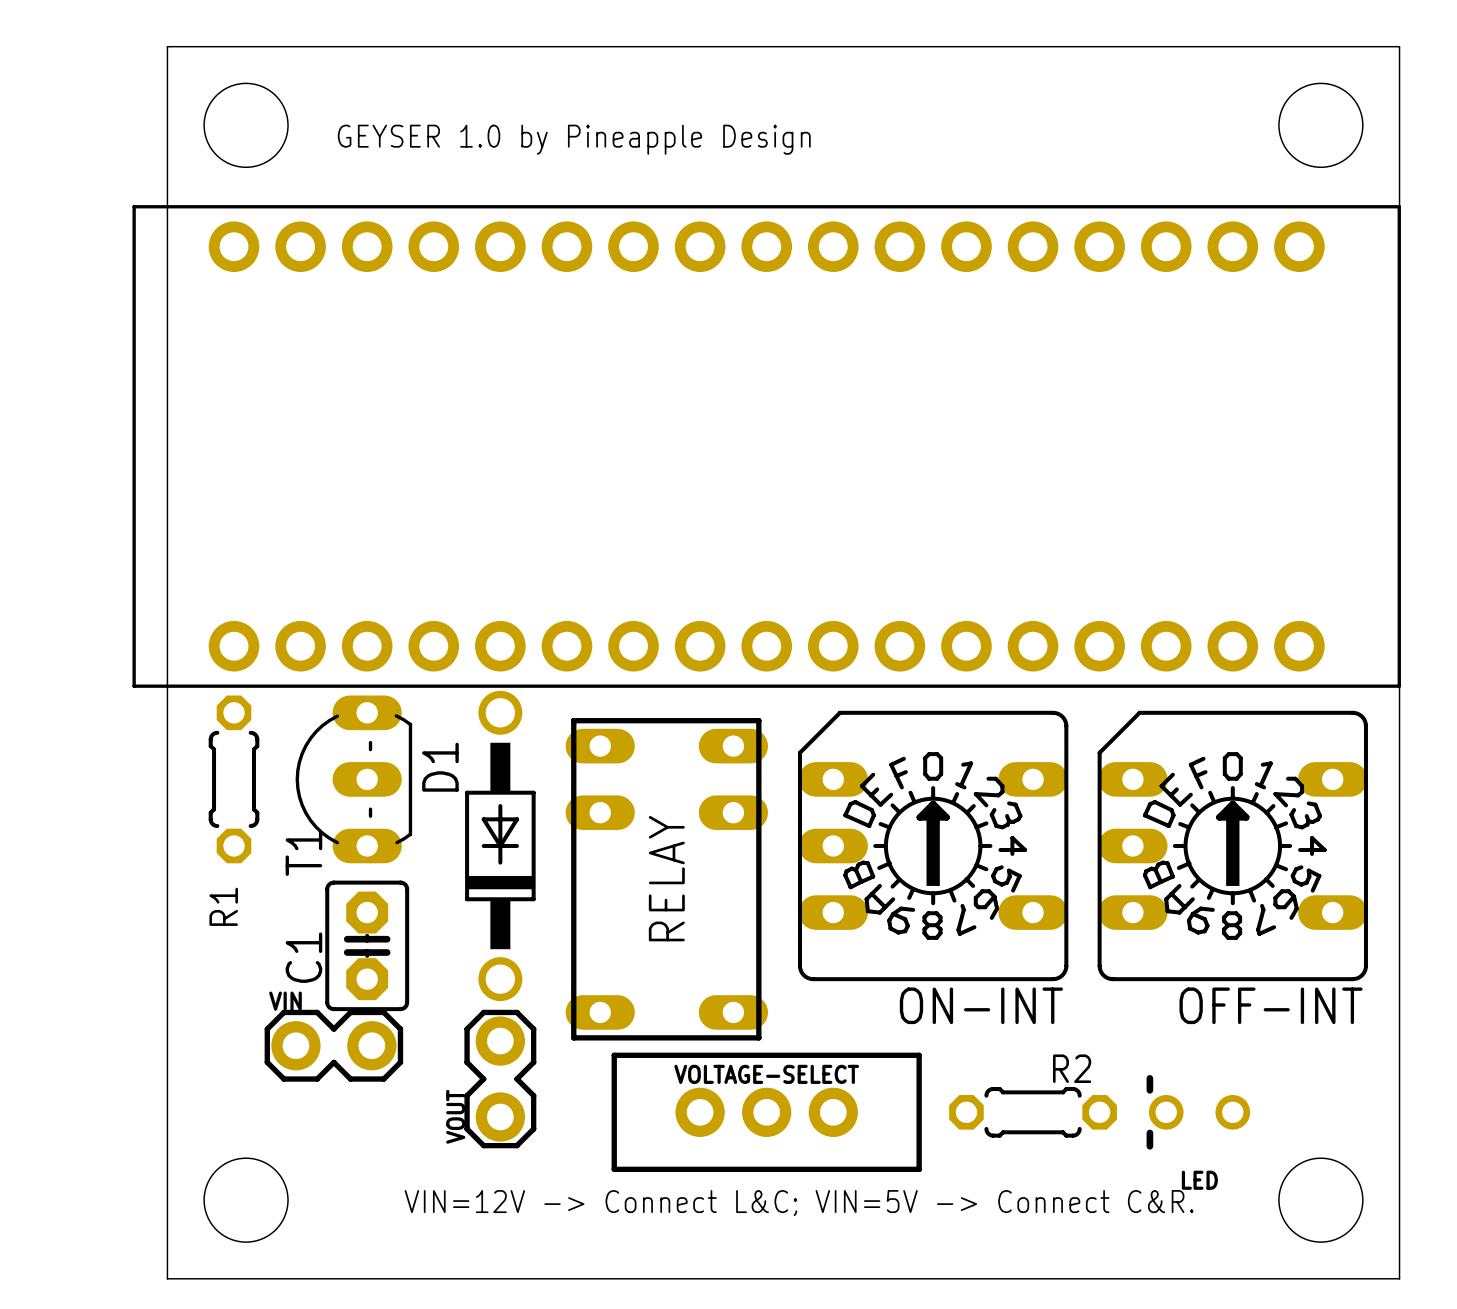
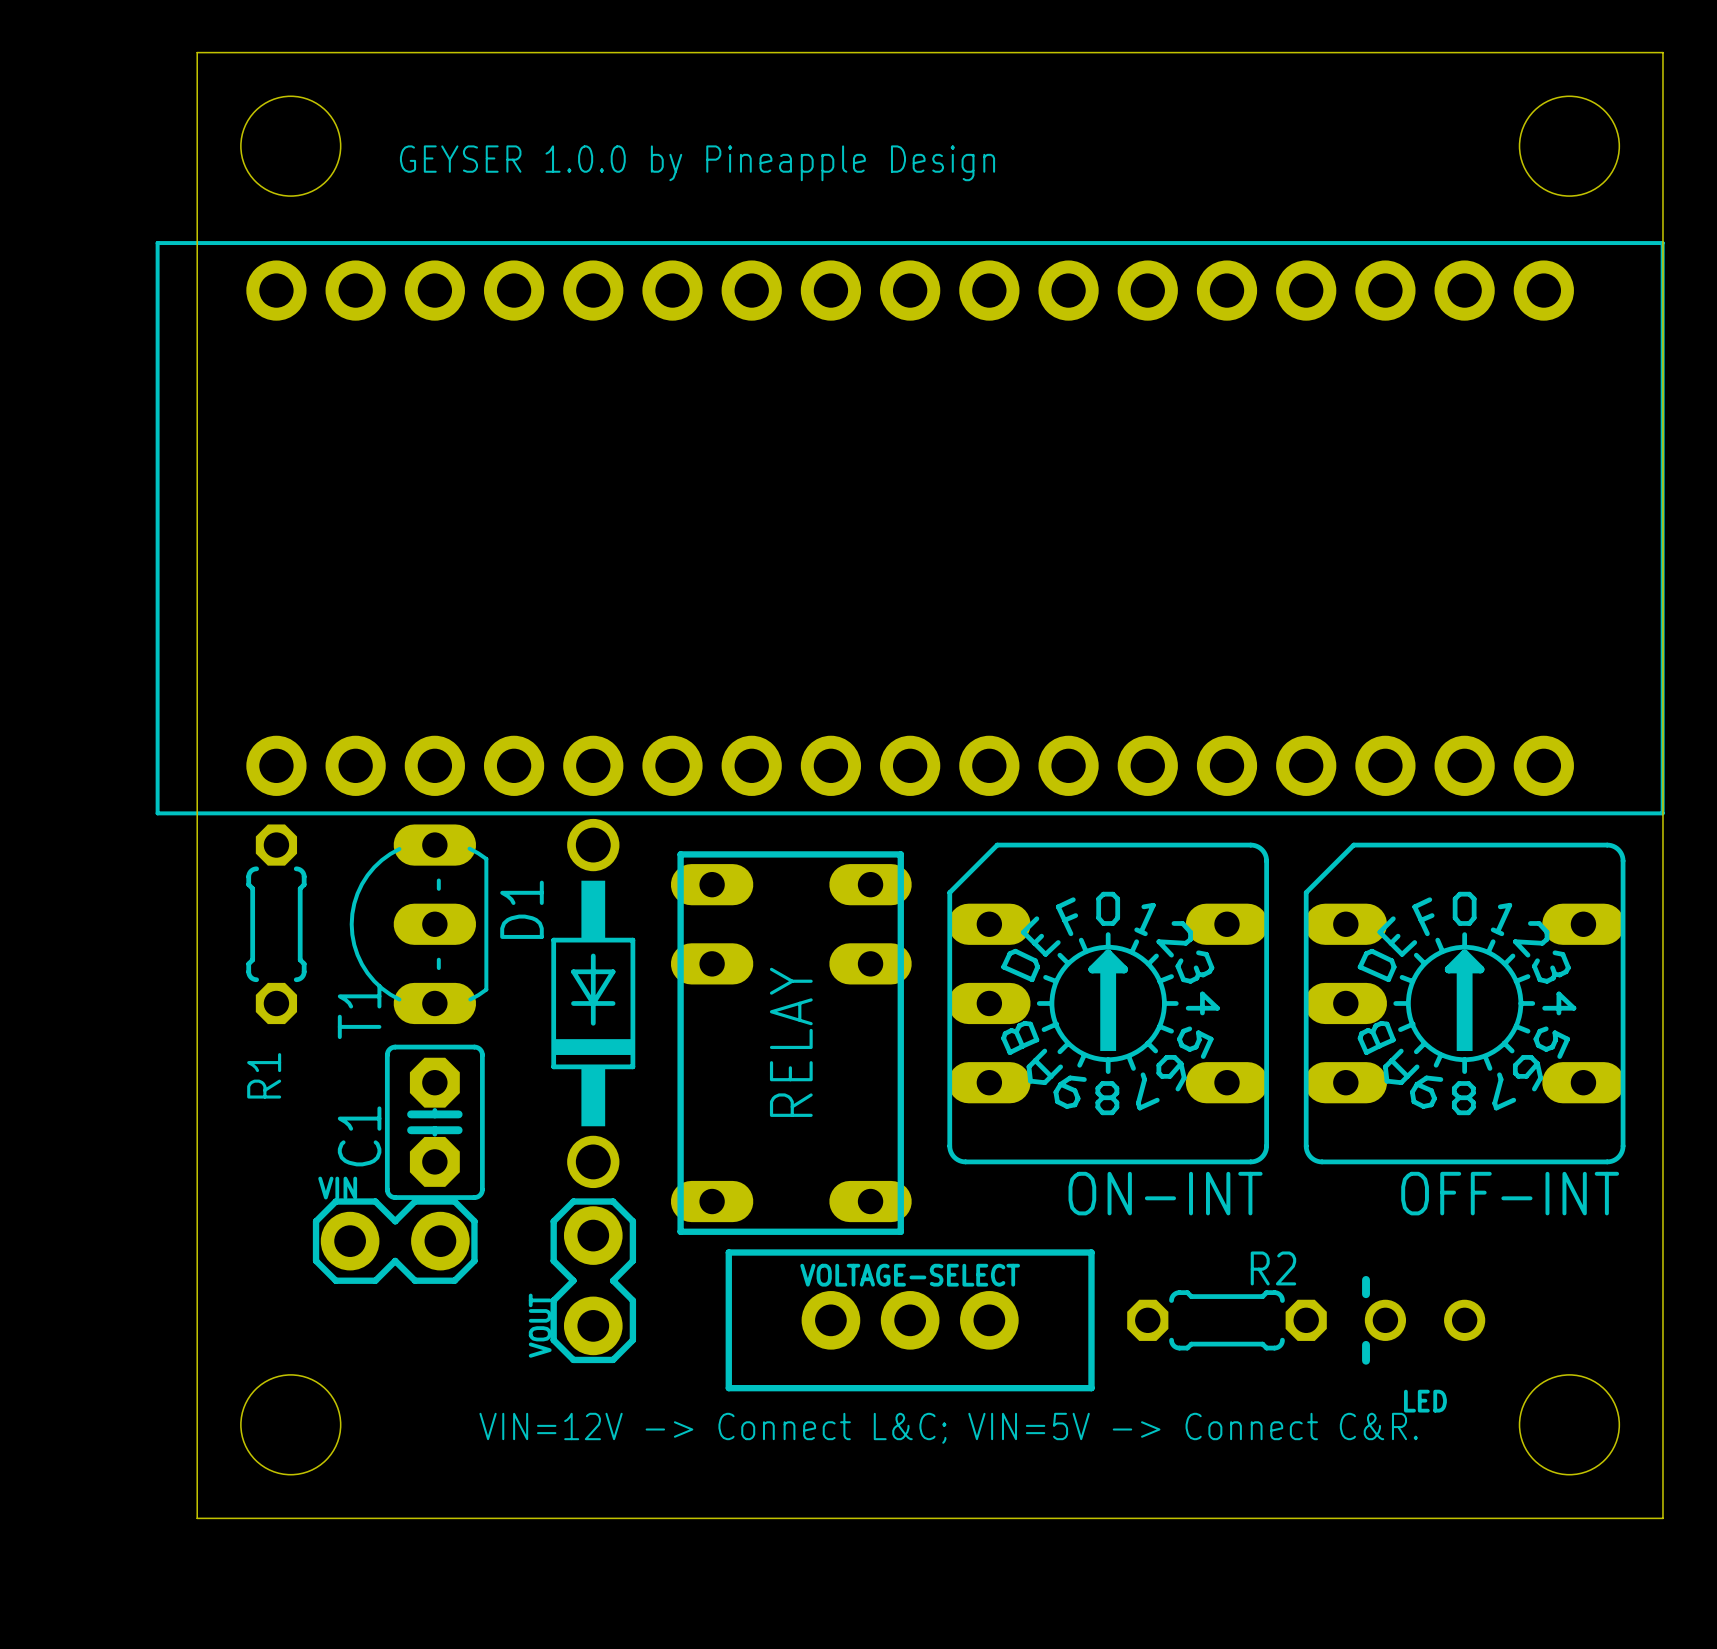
text: GEYSER 1.0 by Pineapple Design (574, 139) -> GEYSER 1.0.0 by Pineapple Design (697, 163)

